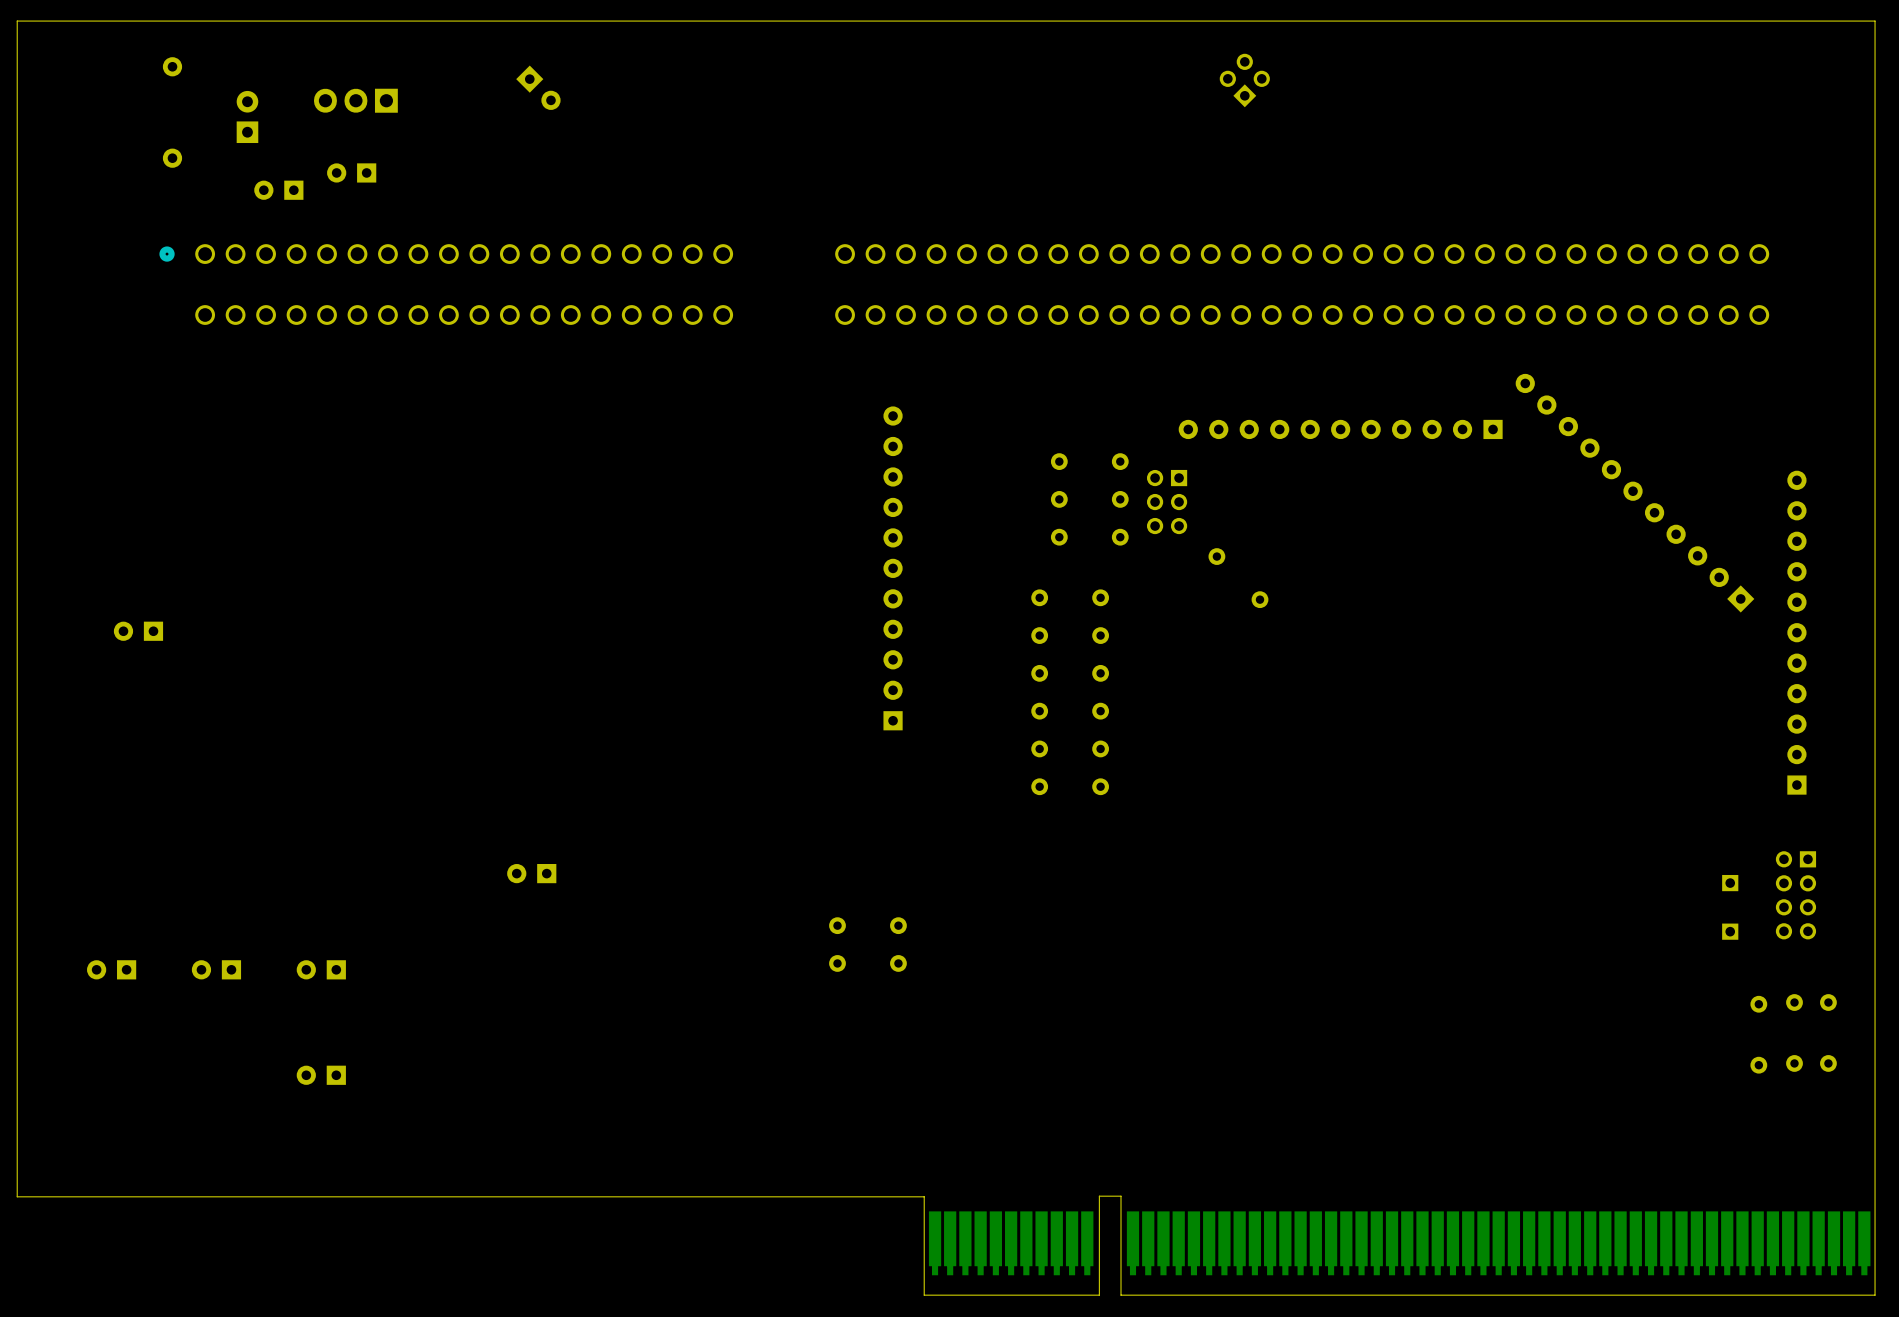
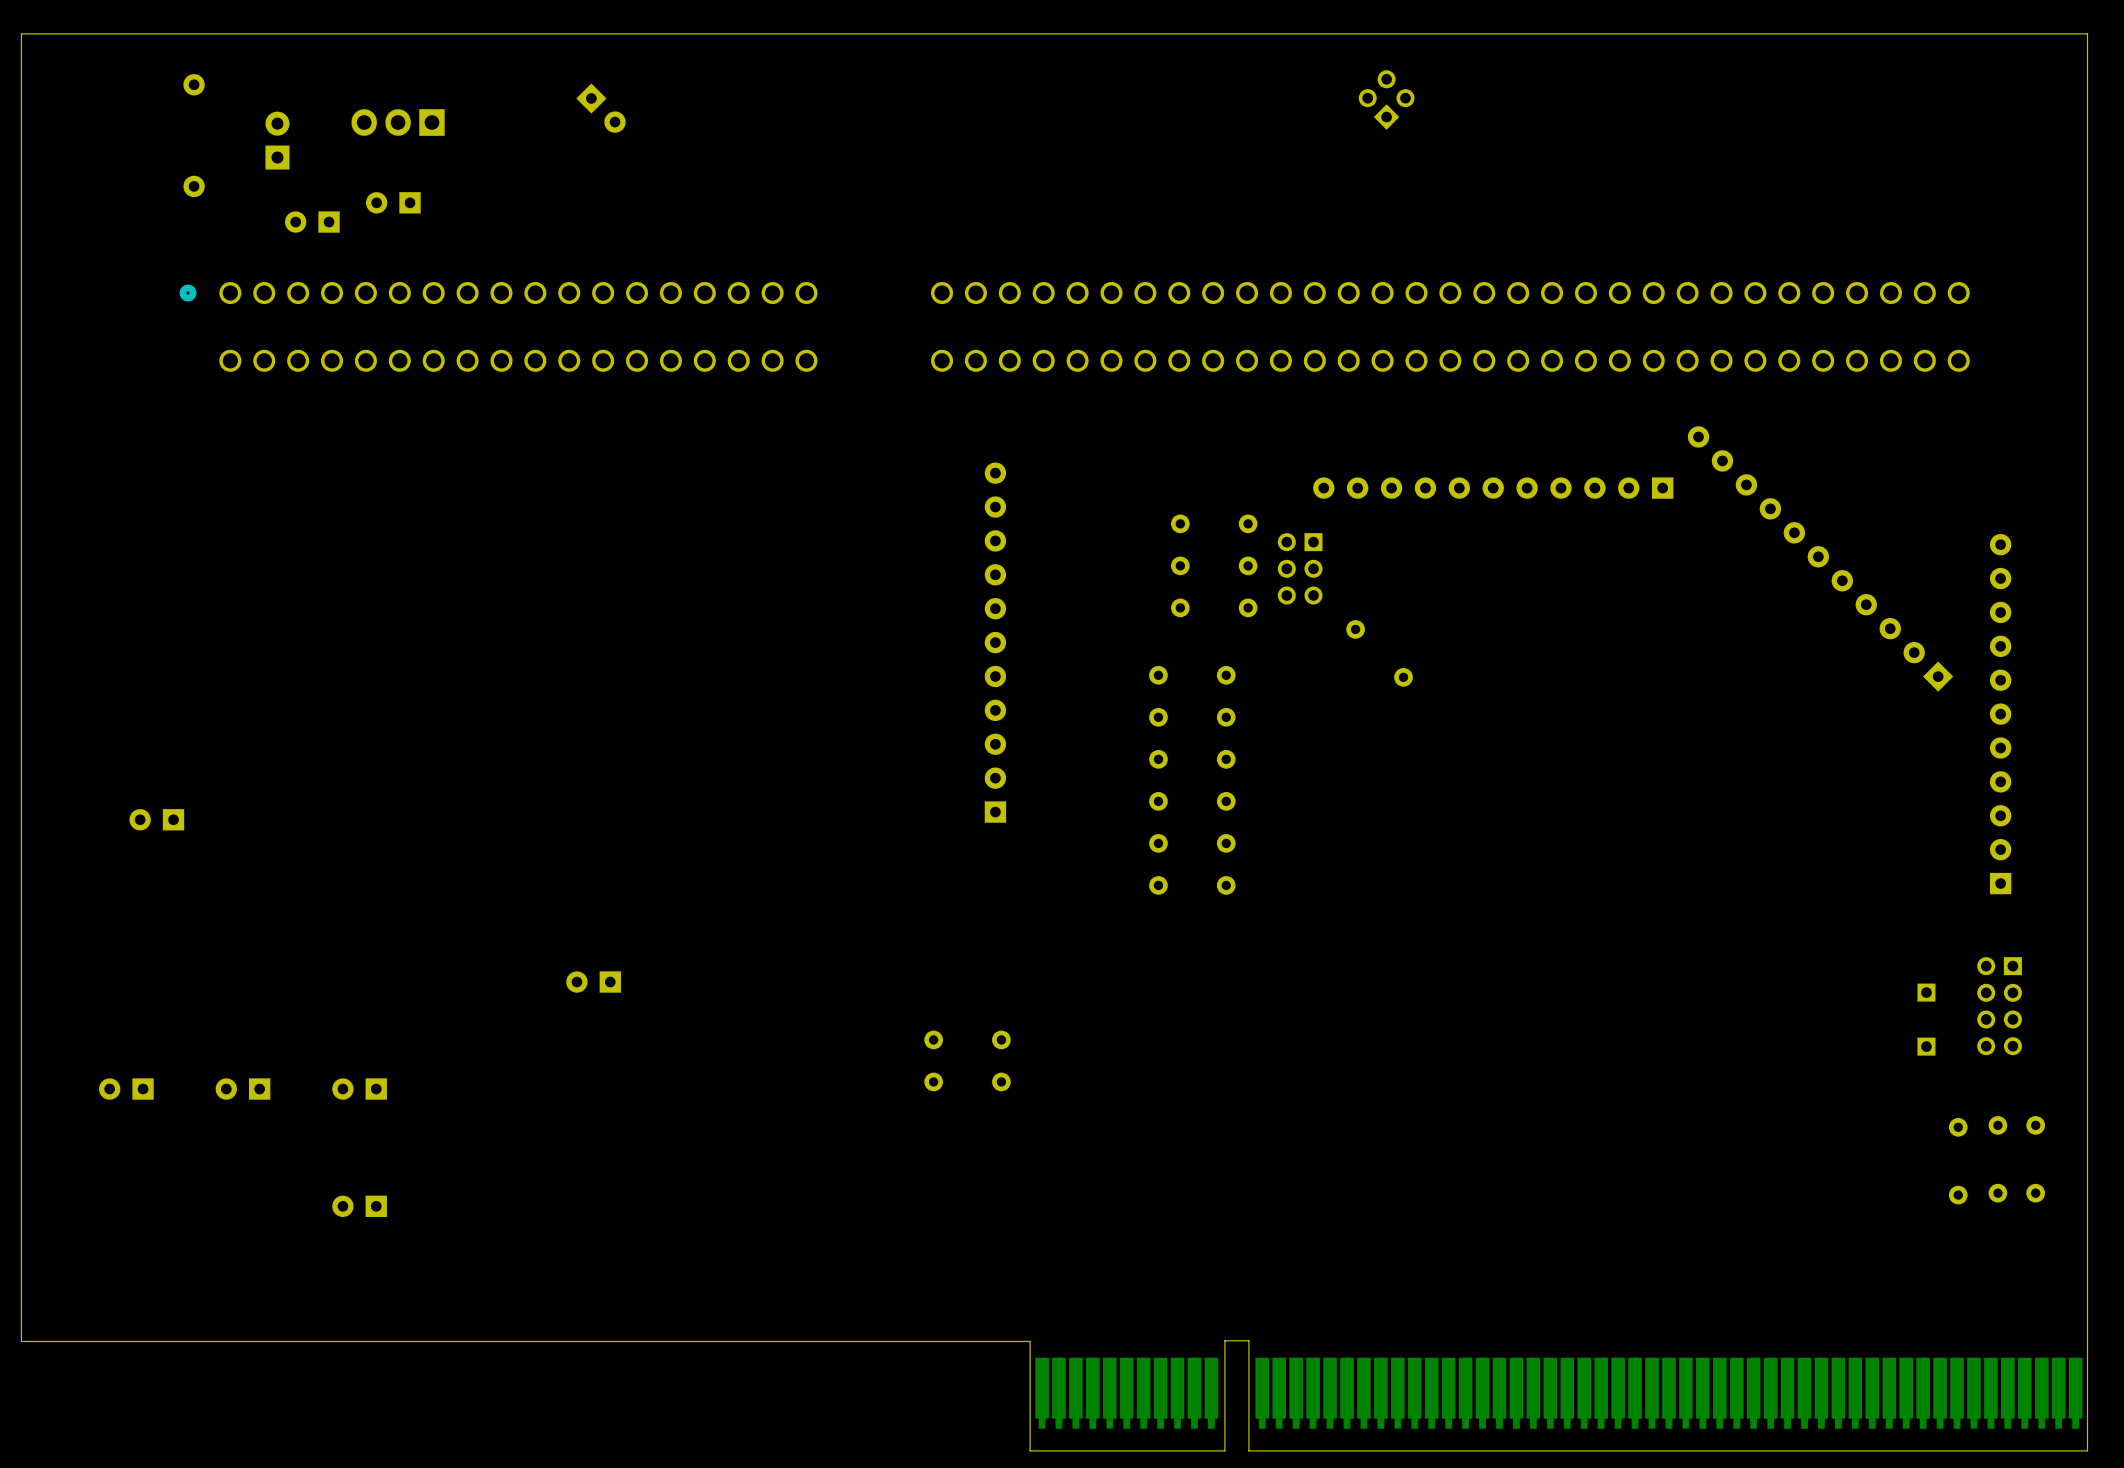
part position: (138, 631) -> (156, 819)

